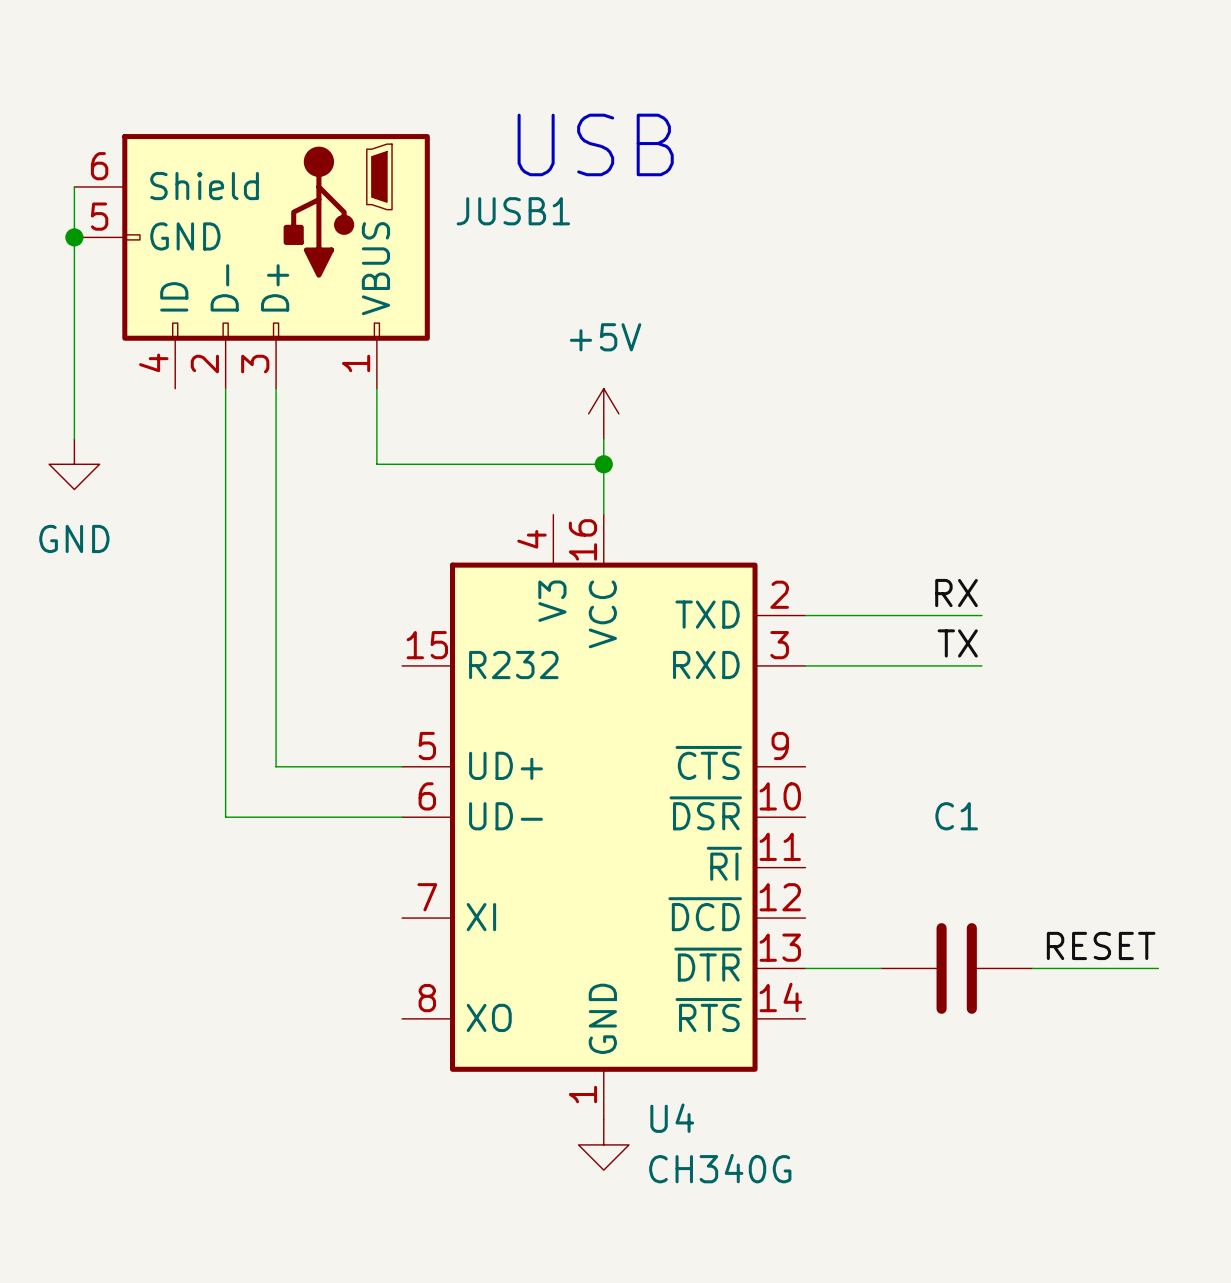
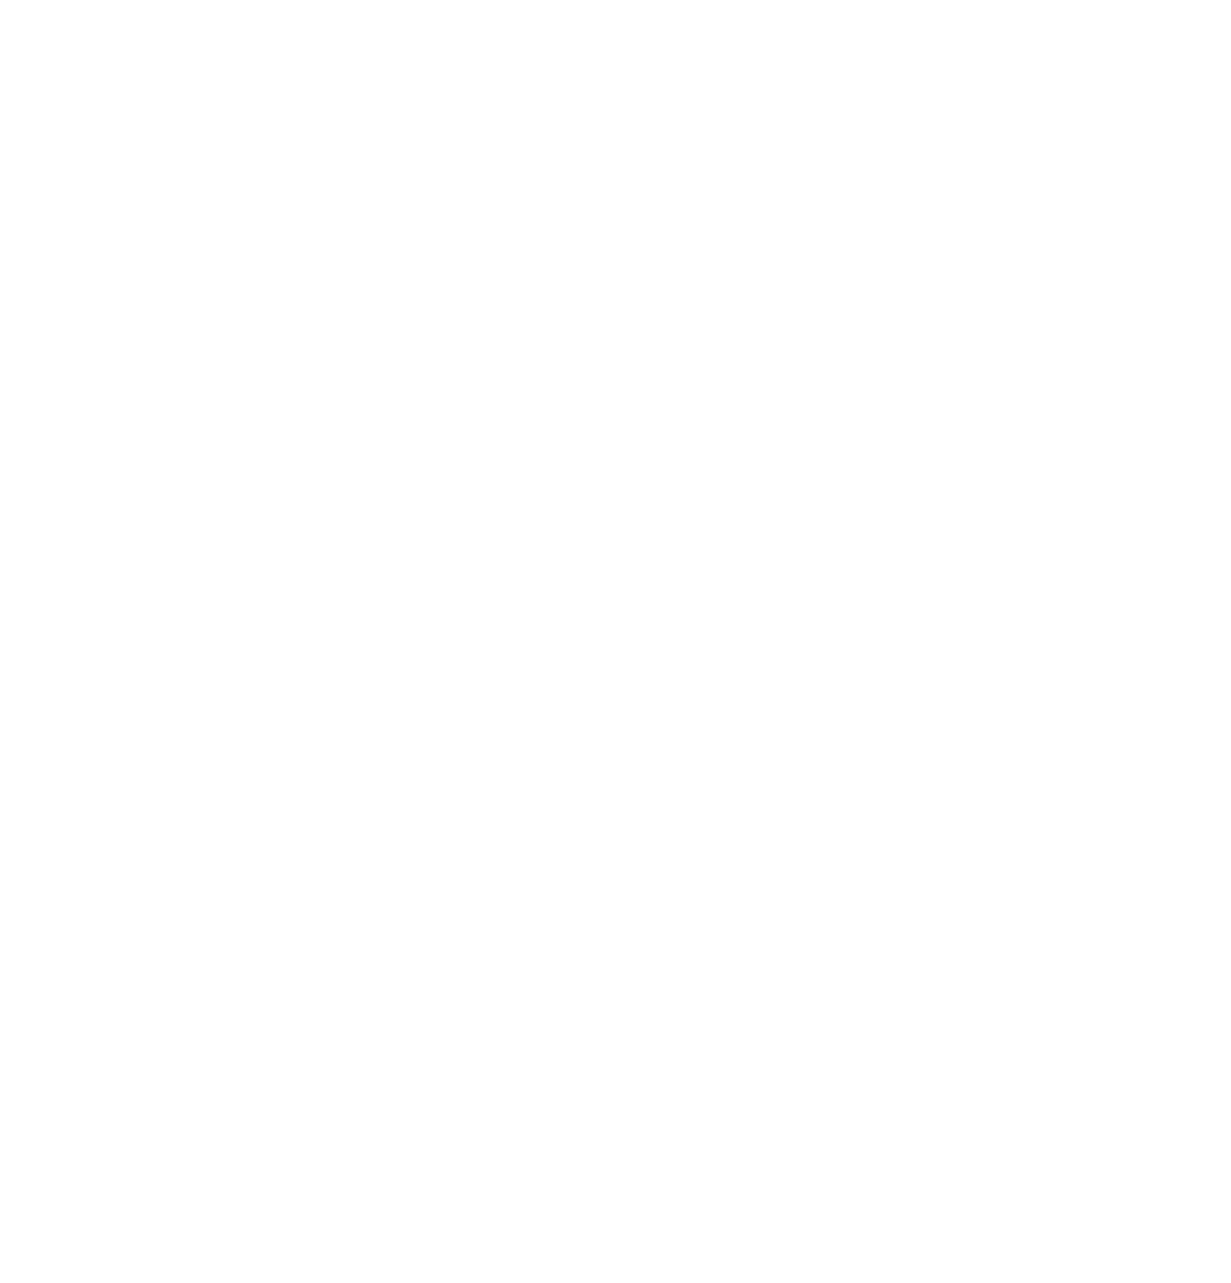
text: USB (595, 144) -> none
wire: (74, 186) (74, 439) -> none
junction: (74, 237) -> none
JUSB1: (252, 261) -> none
wire: (225, 388) (225, 817) (402, 817) -> none
wire: (276, 388) (276, 766) (402, 766) -> none
wire: (376, 388) (376, 464) (603, 464) -> none
power symbol: +5V (603, 413) -> none
wire: (603, 439) (603, 514) -> none
power symbol: GND (74, 464) -> none
junction: (603, 464) -> none
label: RX (956, 593) -> none
wire: (805, 615) (981, 615) -> none
label: TX (957, 643) -> none
wire: (805, 665) (981, 665) -> none
U4: CH340G (603, 817) -> none
label: RESET (1101, 945) -> none
wire: (805, 968) (881, 968) -> none
C1: (956, 968) -> none
wire: (1032, 968) (1158, 968) -> none
power symbol: (603, 1144) -> none

